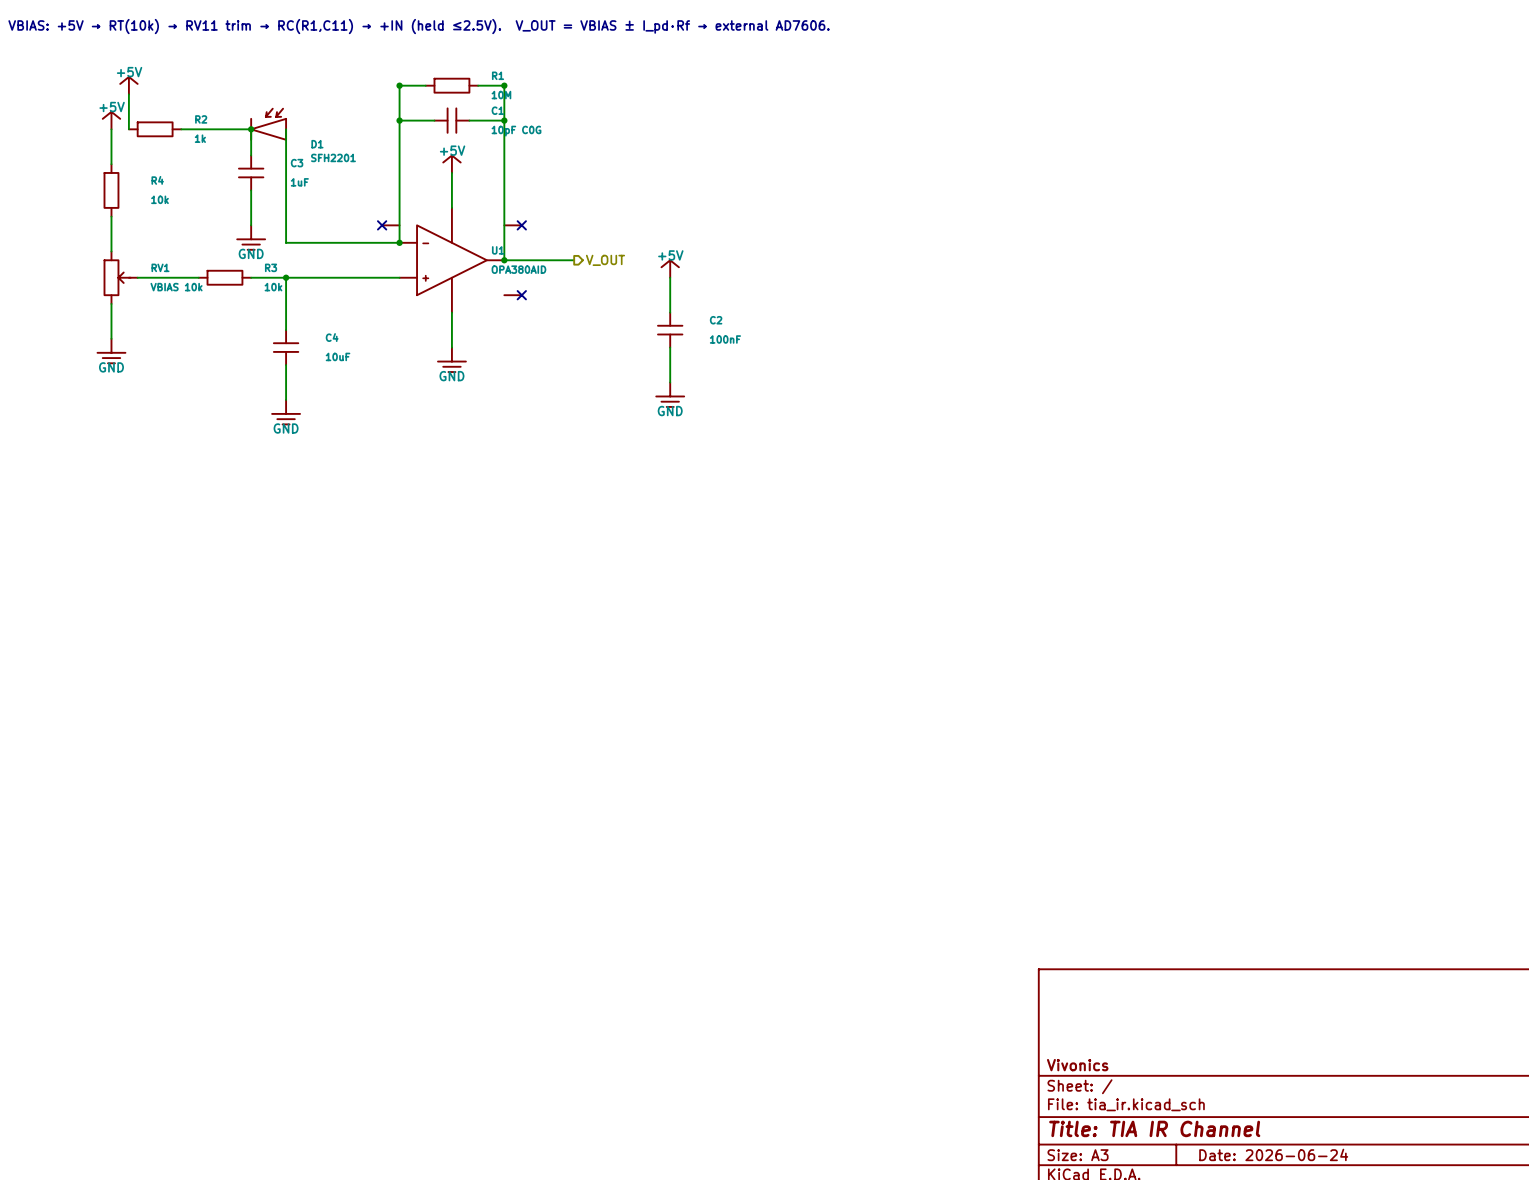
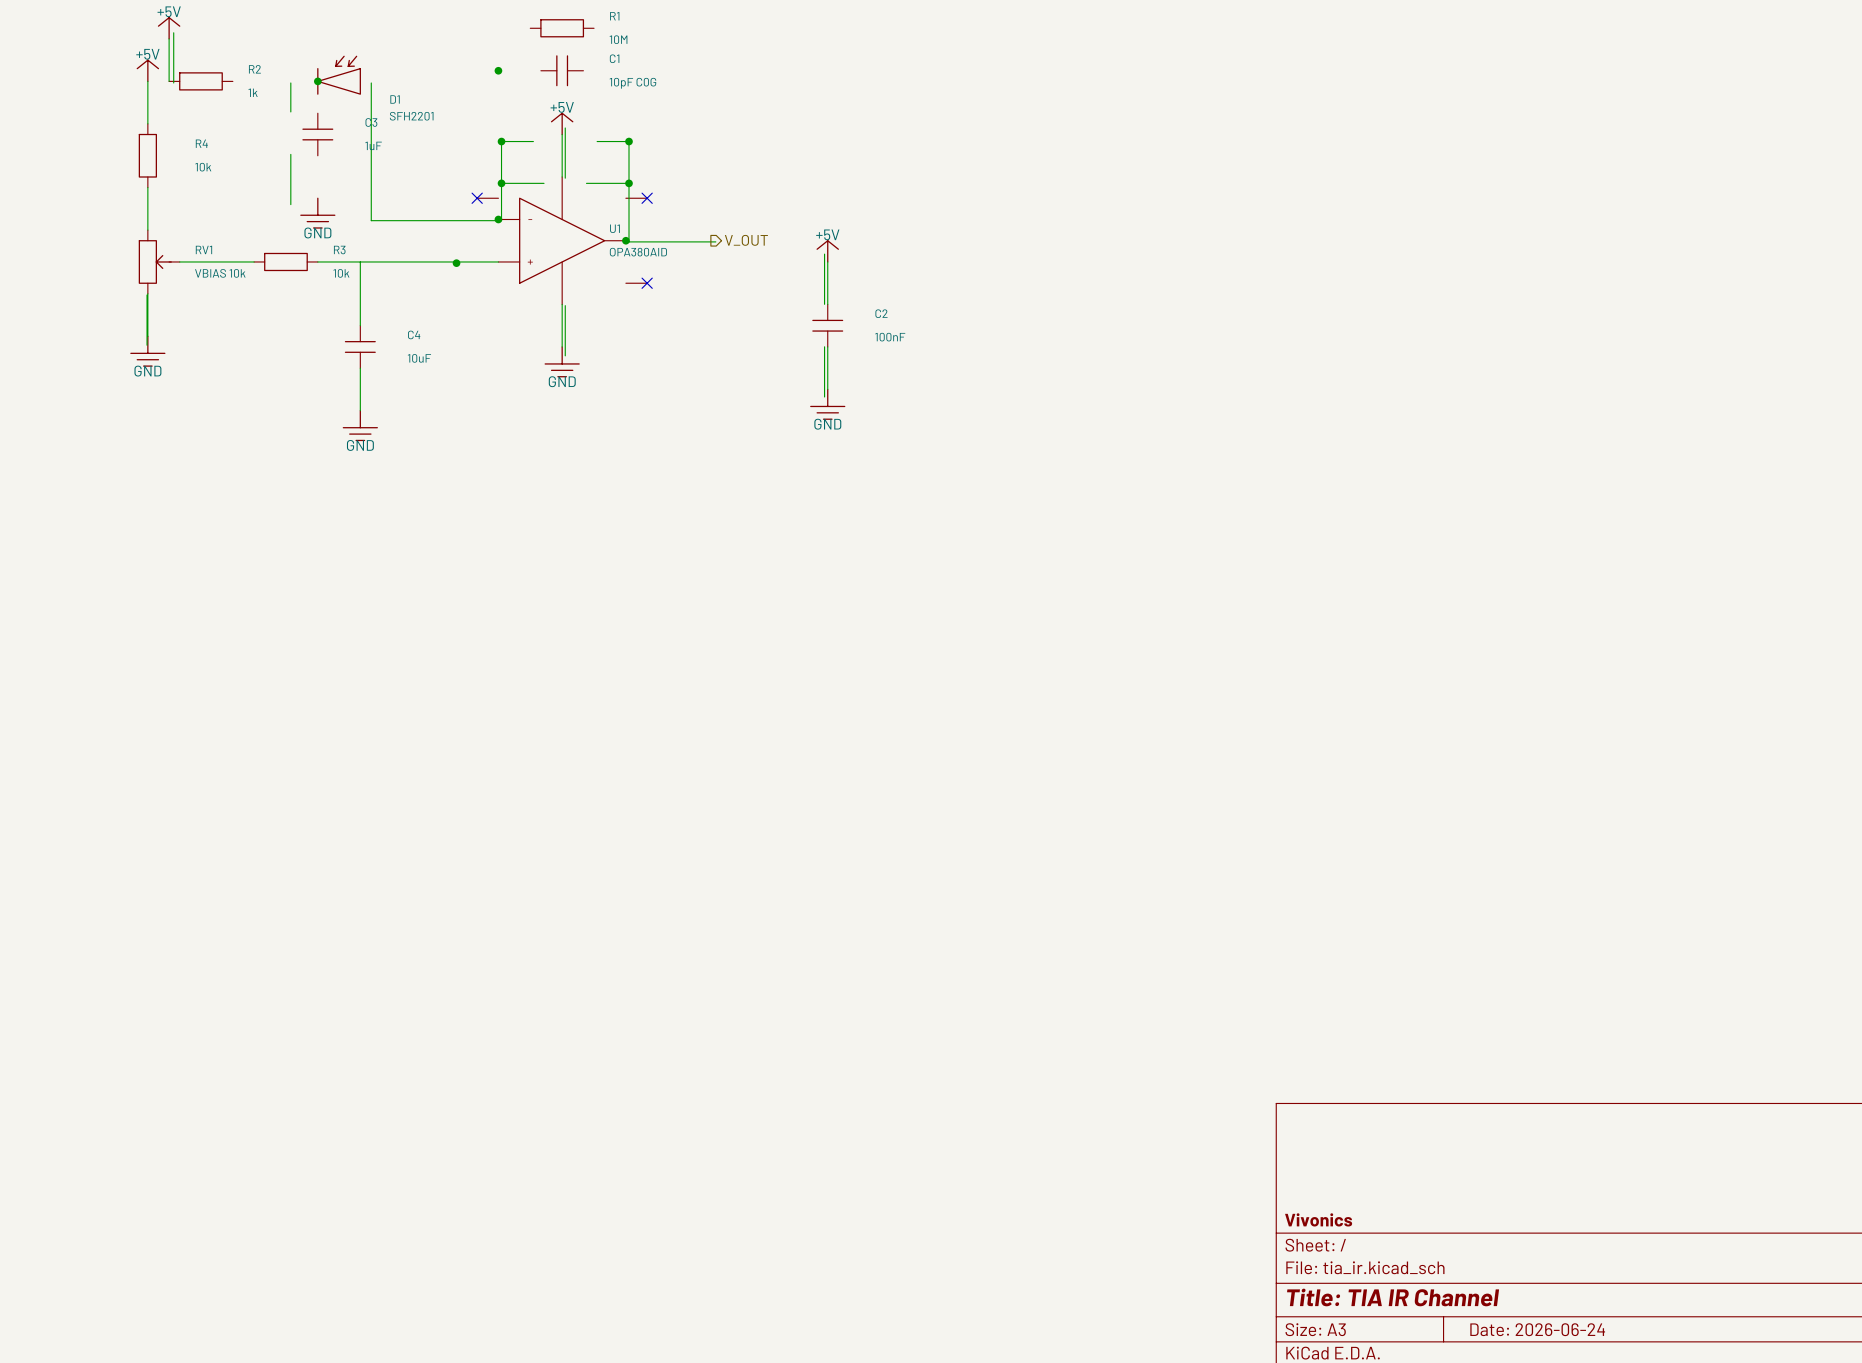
junction: (399, 85) -> none
wire: (425, 85) (399, 85) (399, 242) (286, 242) (286, 129) -> none
wire: (478, 85) (504, 85) (504, 260) (574, 260) -> none
junction: (504, 85) -> none
wire: none -> (173, 32) (173, 82)
wire: (399, 120) (434, 120) -> (501, 183) (544, 183)
wire: (469, 120) (504, 120) -> (586, 183) (629, 183)
junction: (504, 120) -> none
wire: (181, 129) (251, 129) (251, 155) -> none
wire: none -> (290, 82) (290, 111)
wire: none -> (371, 82) (371, 220) (501, 220) (501, 141) (533, 141)
wire: none -> (565, 127) (565, 178)
junction: none -> (501, 141)
wire: none -> (597, 141) (629, 141) (629, 241) (715, 241)
junction: none -> (629, 141)
wire: none -> (290, 154) (290, 204)
wire: (251, 190) (251, 225) -> none
junction: none -> (501, 183)
junction: none -> (629, 183)
wire: none -> (824, 254) (824, 304)
junction: (286, 277) -> none
junction: none -> (456, 263)
wire: none -> (147, 295) (147, 345)
wire: none -> (565, 305) (565, 355)
wire: none -> (824, 346) (824, 396)

